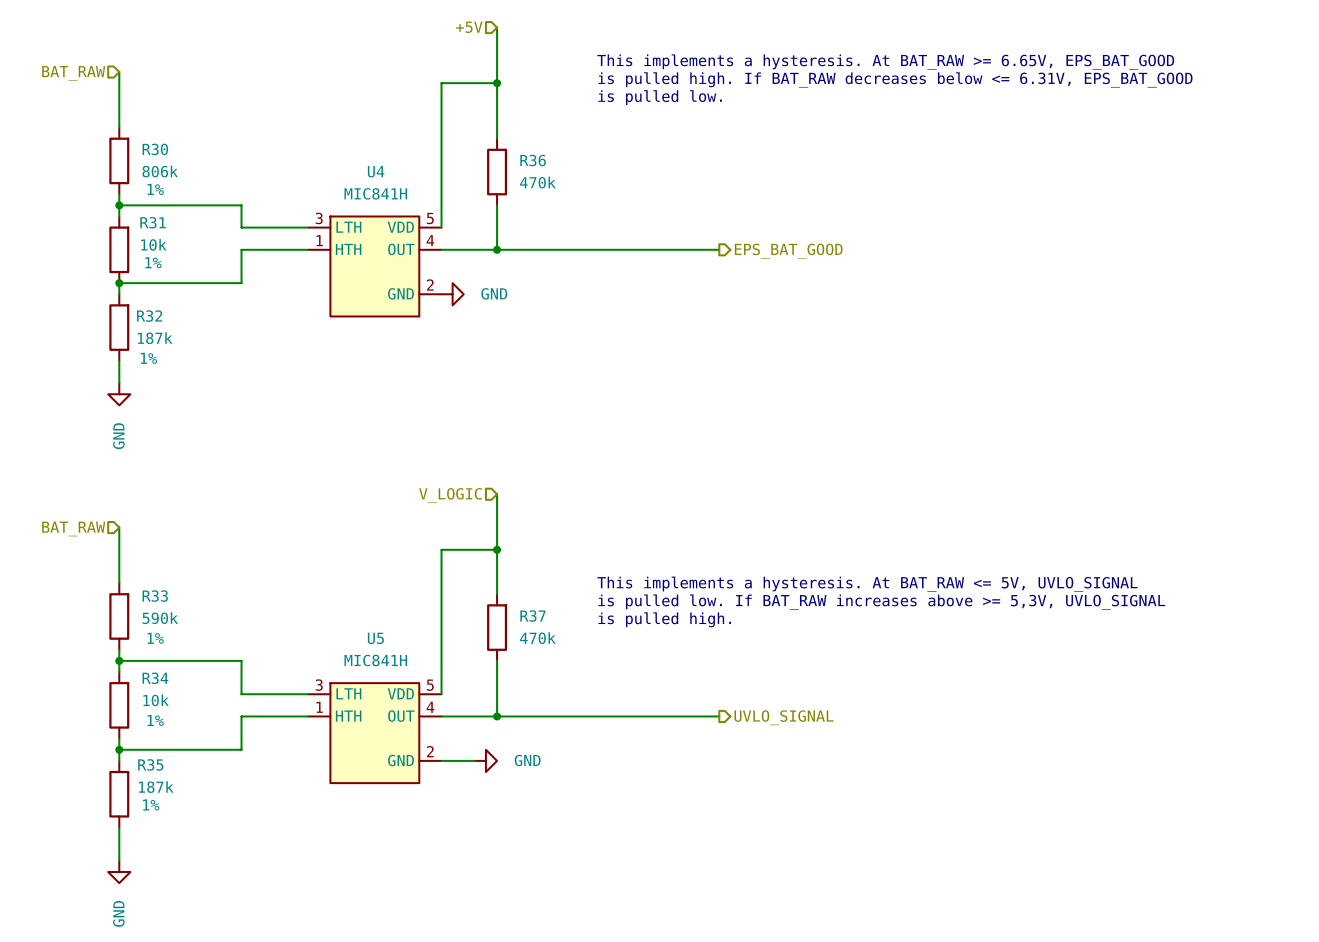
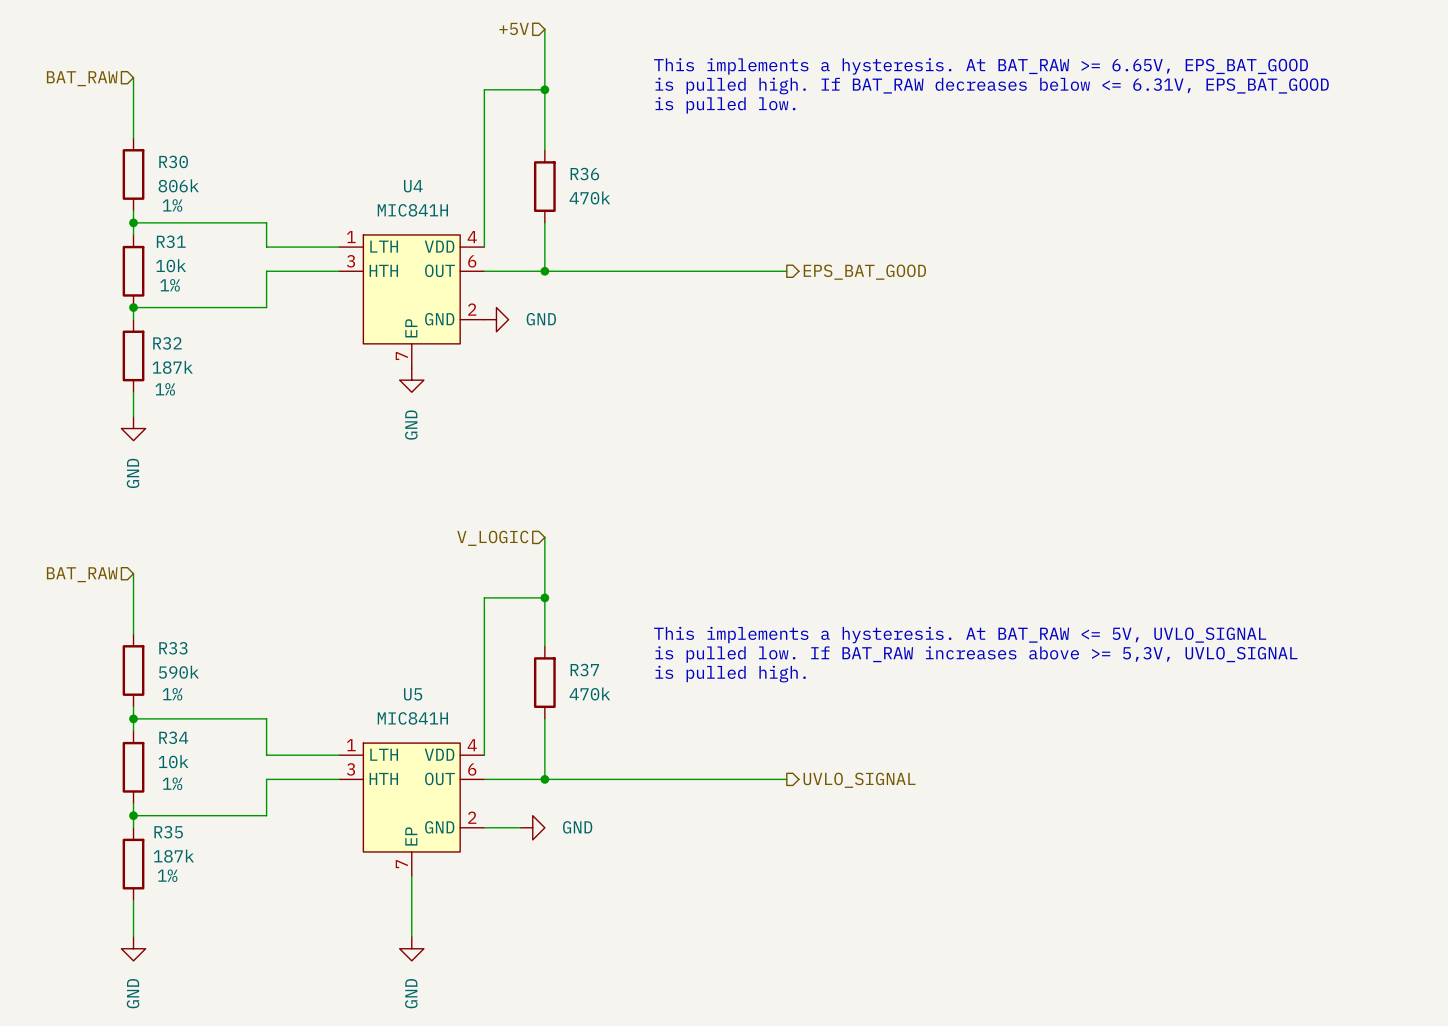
U4 symbol: [308, 216, 442, 317] -> [339, 234, 485, 369]
power symbol: none -> GND (411, 380)
U5 symbol: [308, 683, 442, 784] -> [339, 743, 485, 877]
wire: none -> (411, 876) (411, 936)
power symbol: none -> GND (411, 948)

